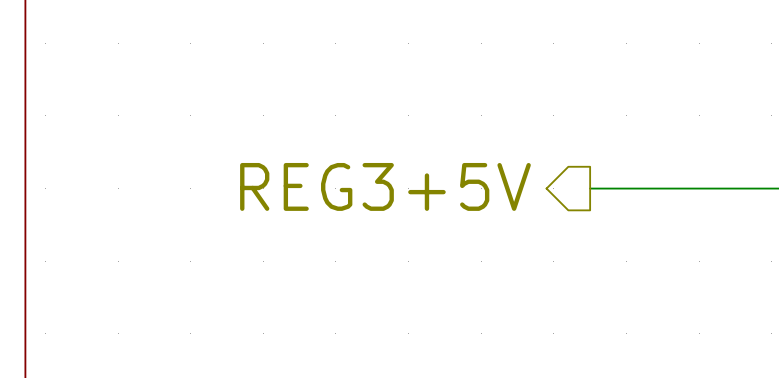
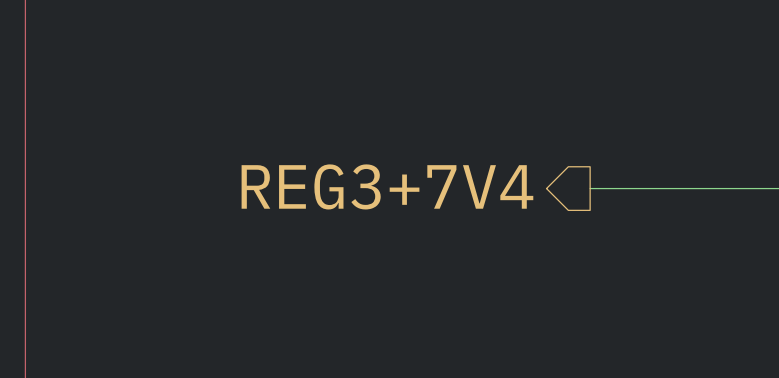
hierarchical label: REG3+5V (385, 186) -> REG3+7V4 (387, 186)

